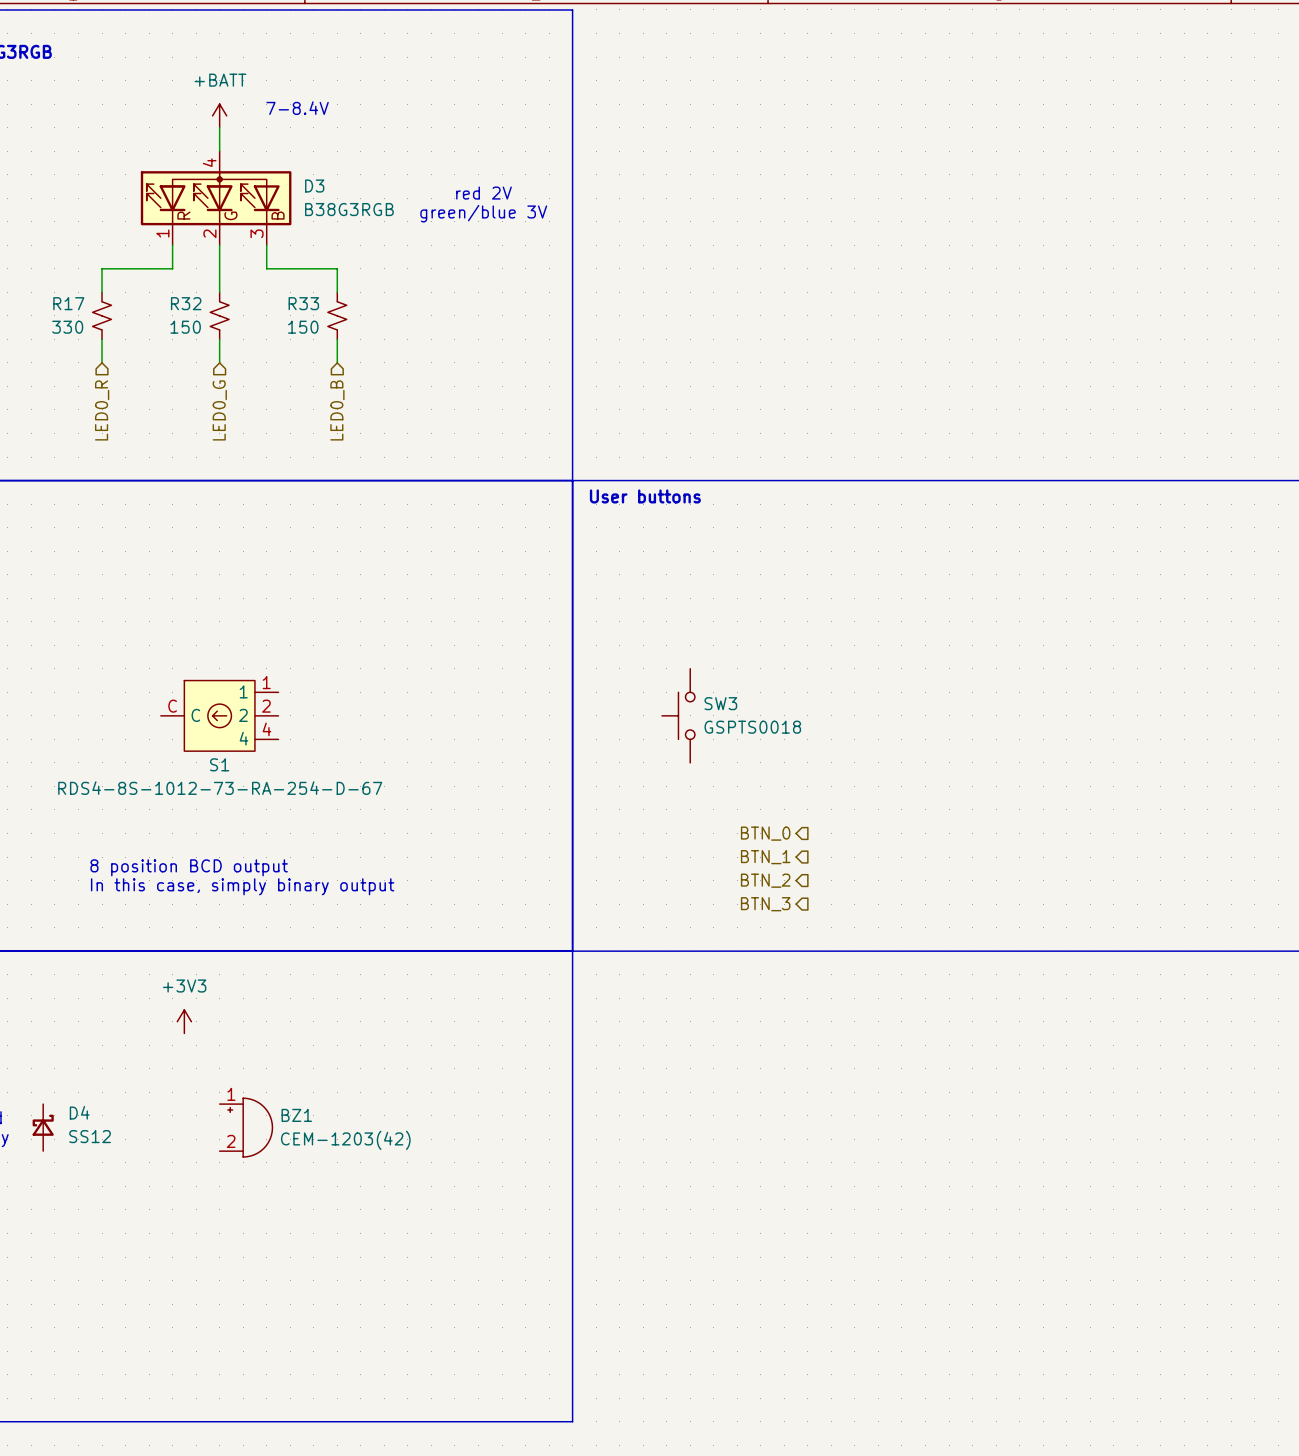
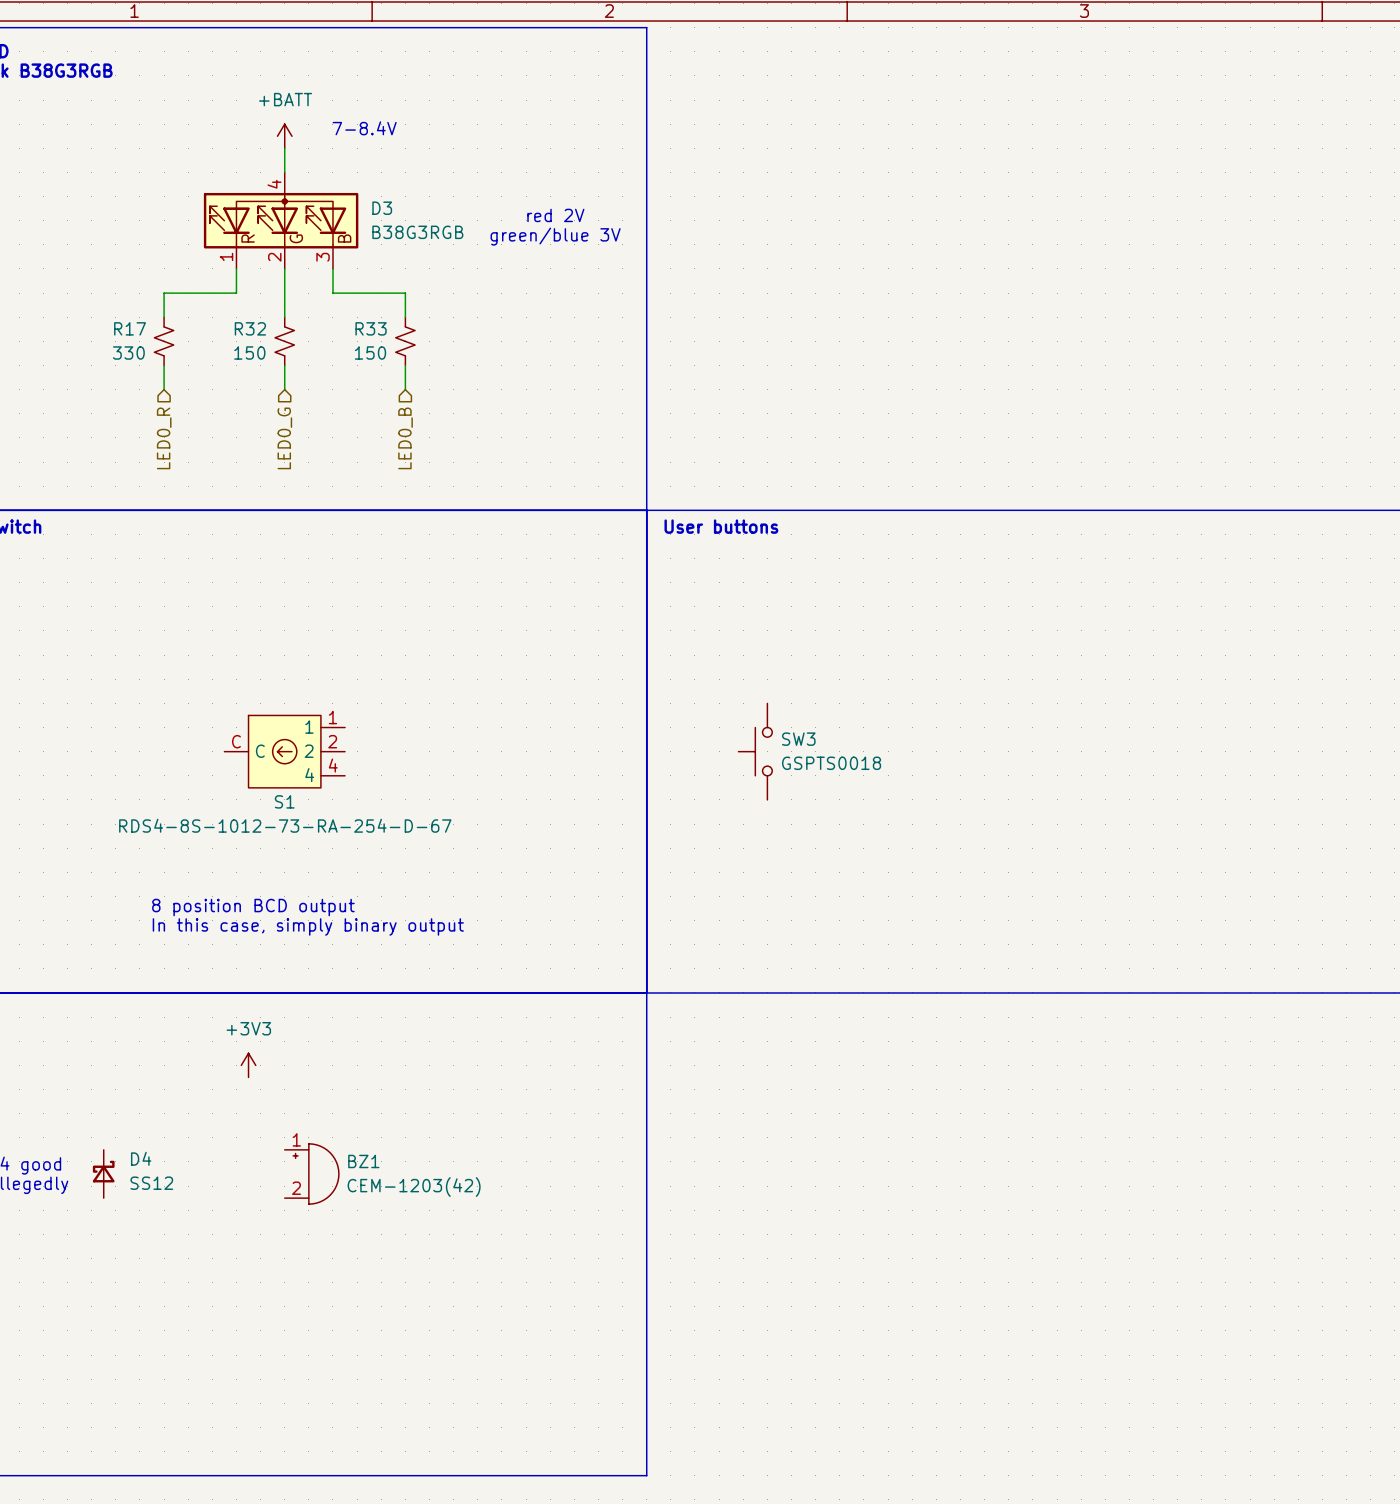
hierarchical label: BTN_0 (765, 833) -> none
hierarchical label: BTN_1 (765, 857) -> none
hierarchical label: BTN_2 (765, 880) -> none
hierarchical label: BTN_3 (765, 904) -> none

